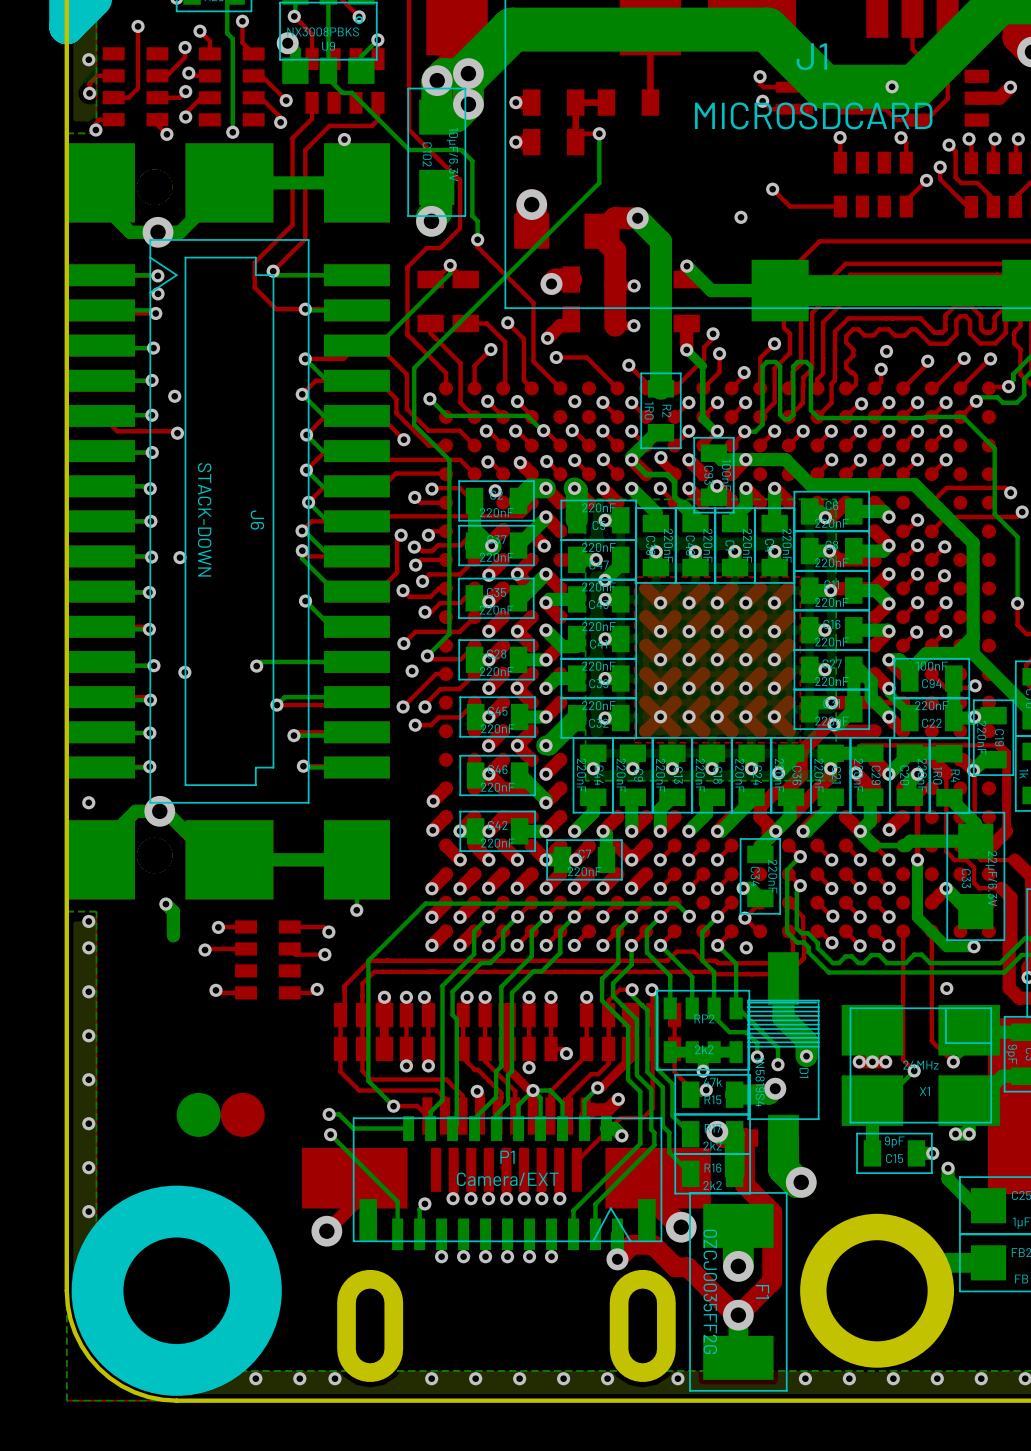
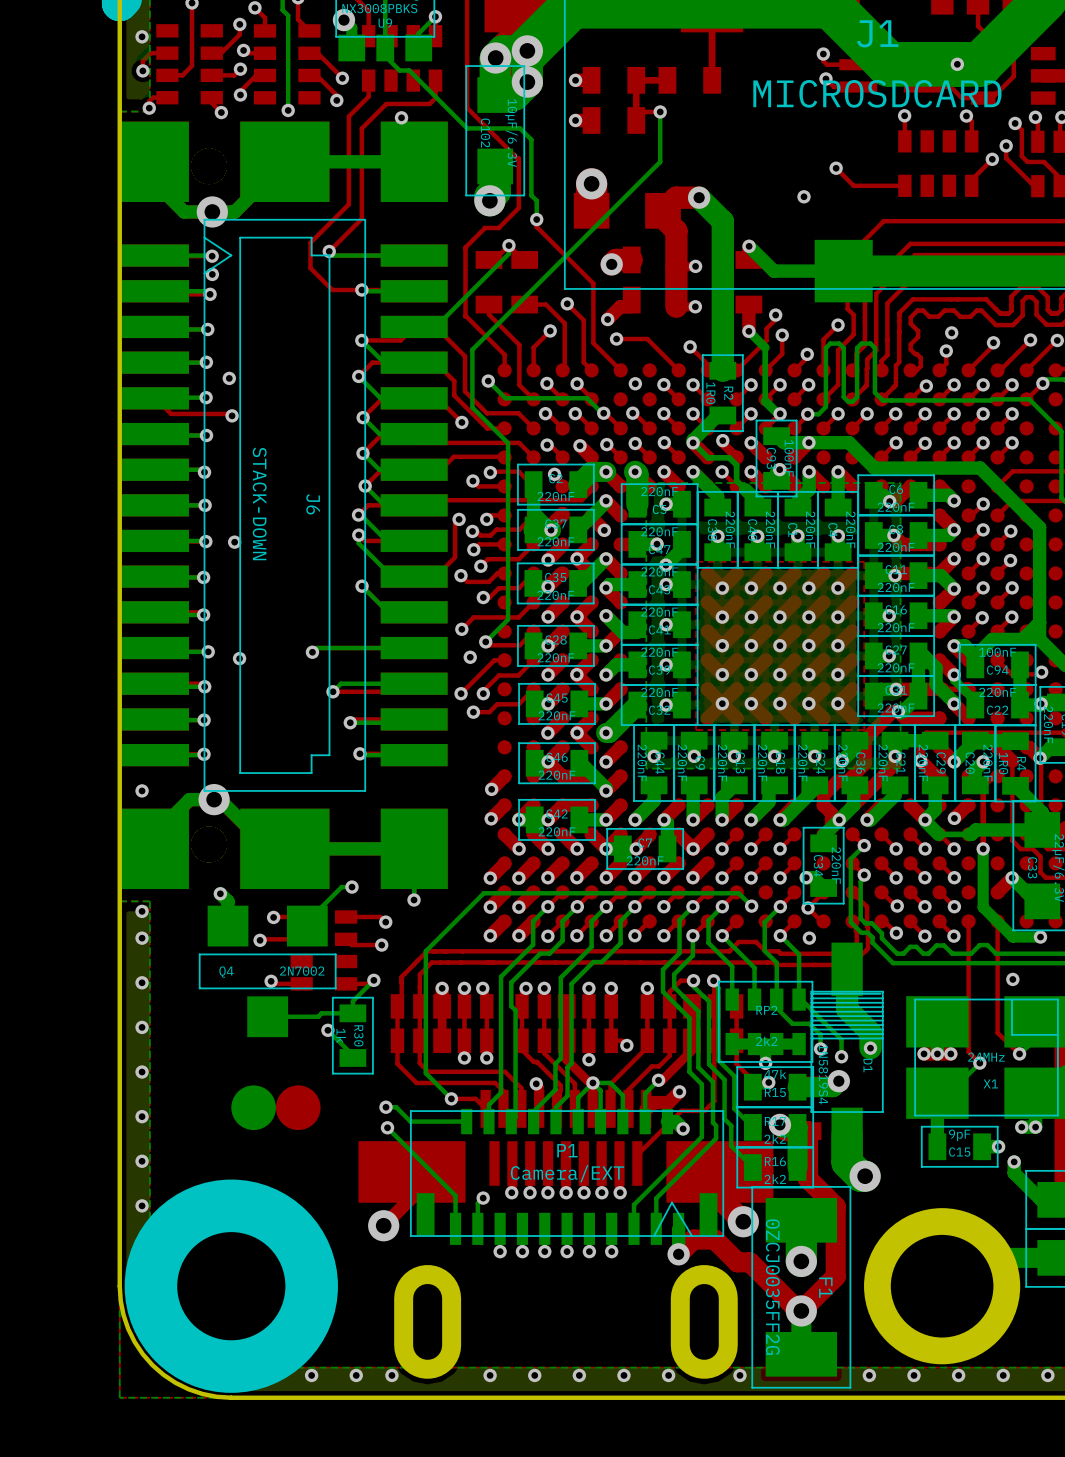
bottom track: none -> (352, 887) (341, 887) (307, 921) (307, 926)
via: none -> (352, 887)
Q4: none -> 2N7002 (267, 971)
bottom track: none -> (373, 980) (352, 1001) (352, 1013) (321, 1013) (318, 1016) (267, 1016)
bottom track: none -> (327, 1030) (352, 1055) (352, 1057)
via: none -> (327, 1030)
R30: none -> 1k (352, 1035)

